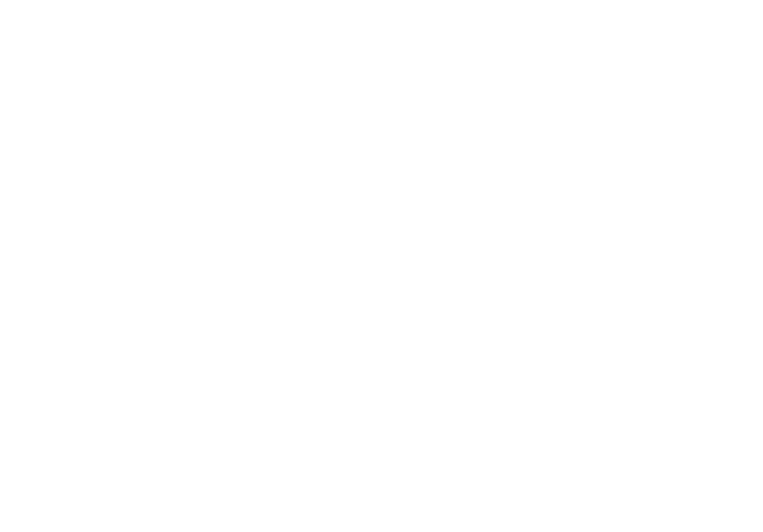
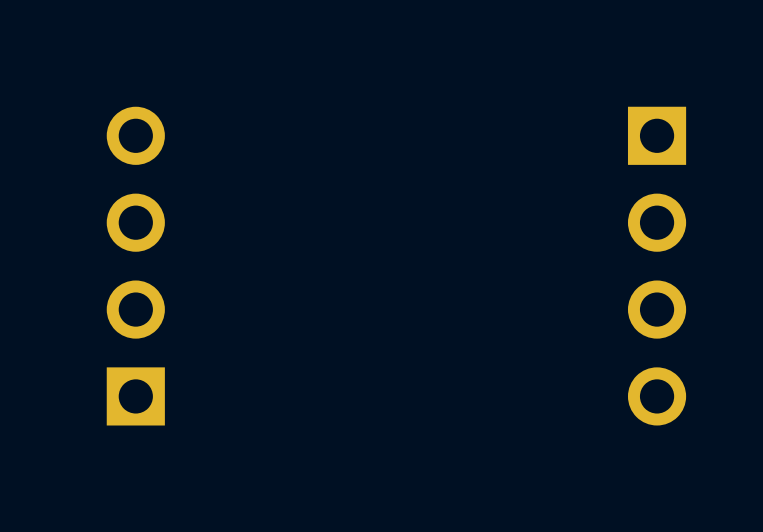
part: none -> (135, 266)
part: none -> (657, 266)

